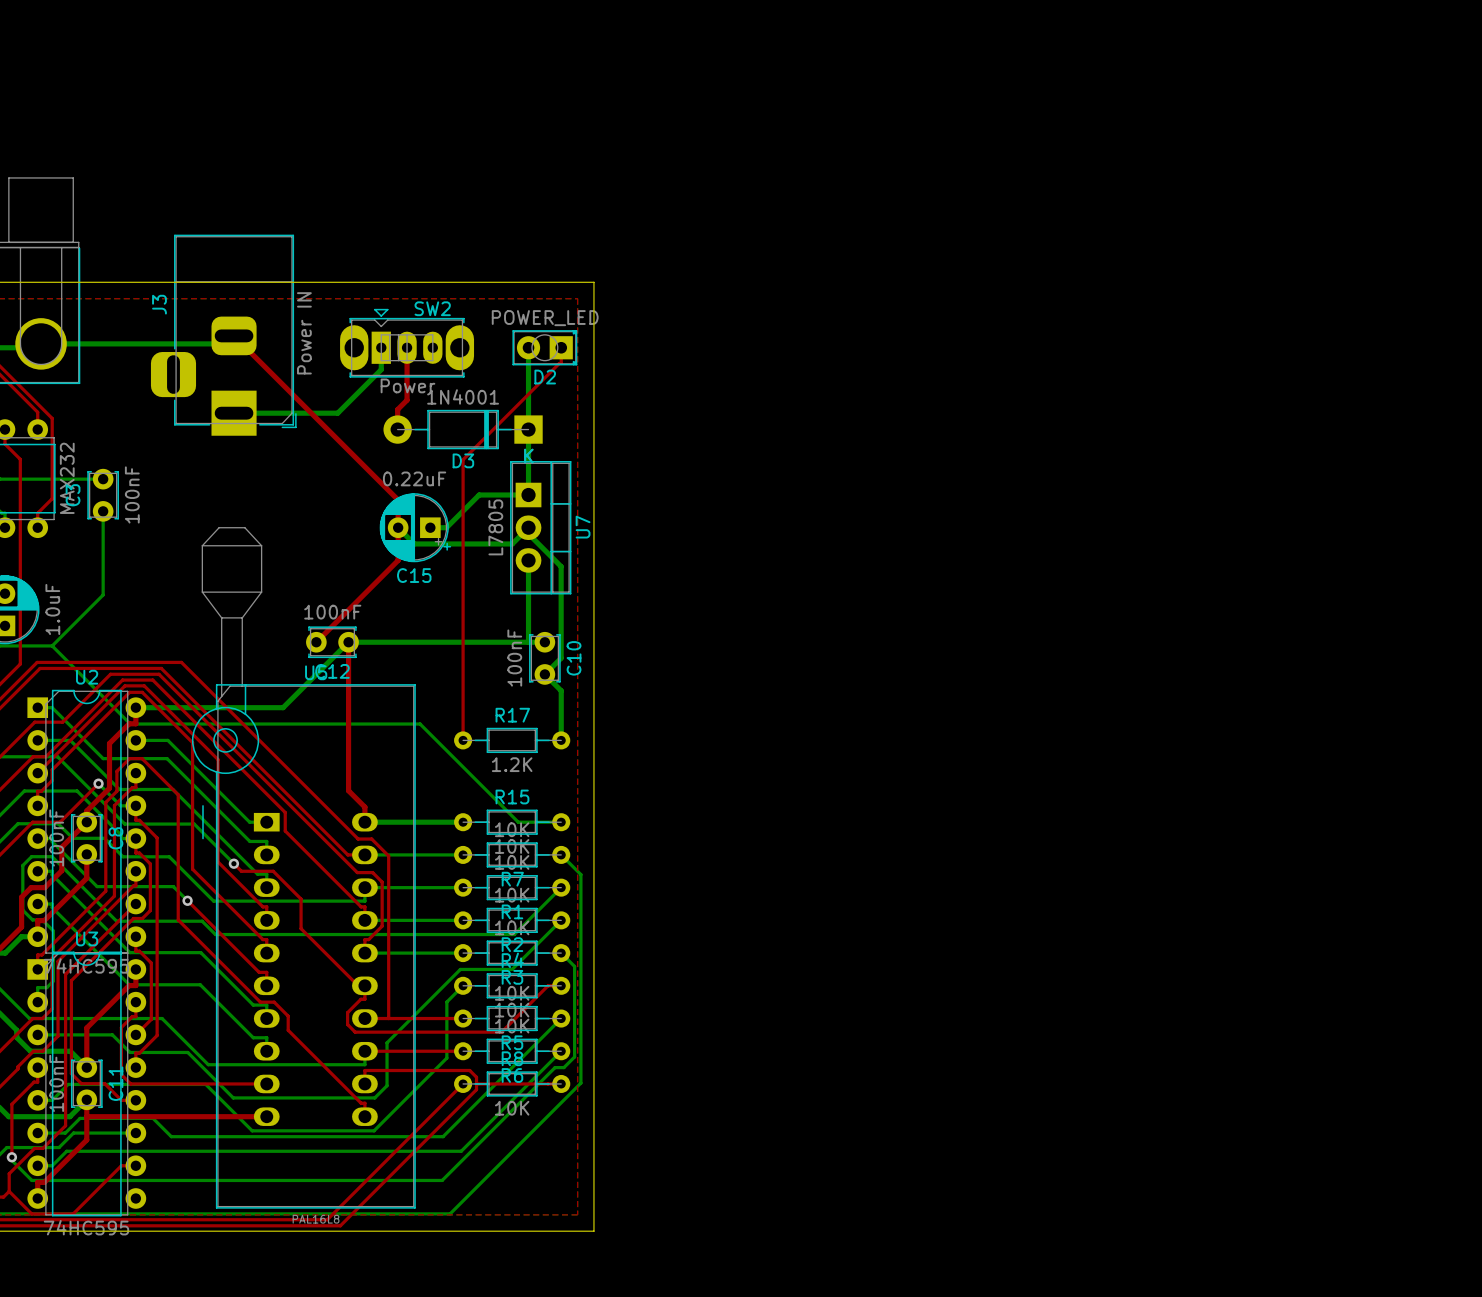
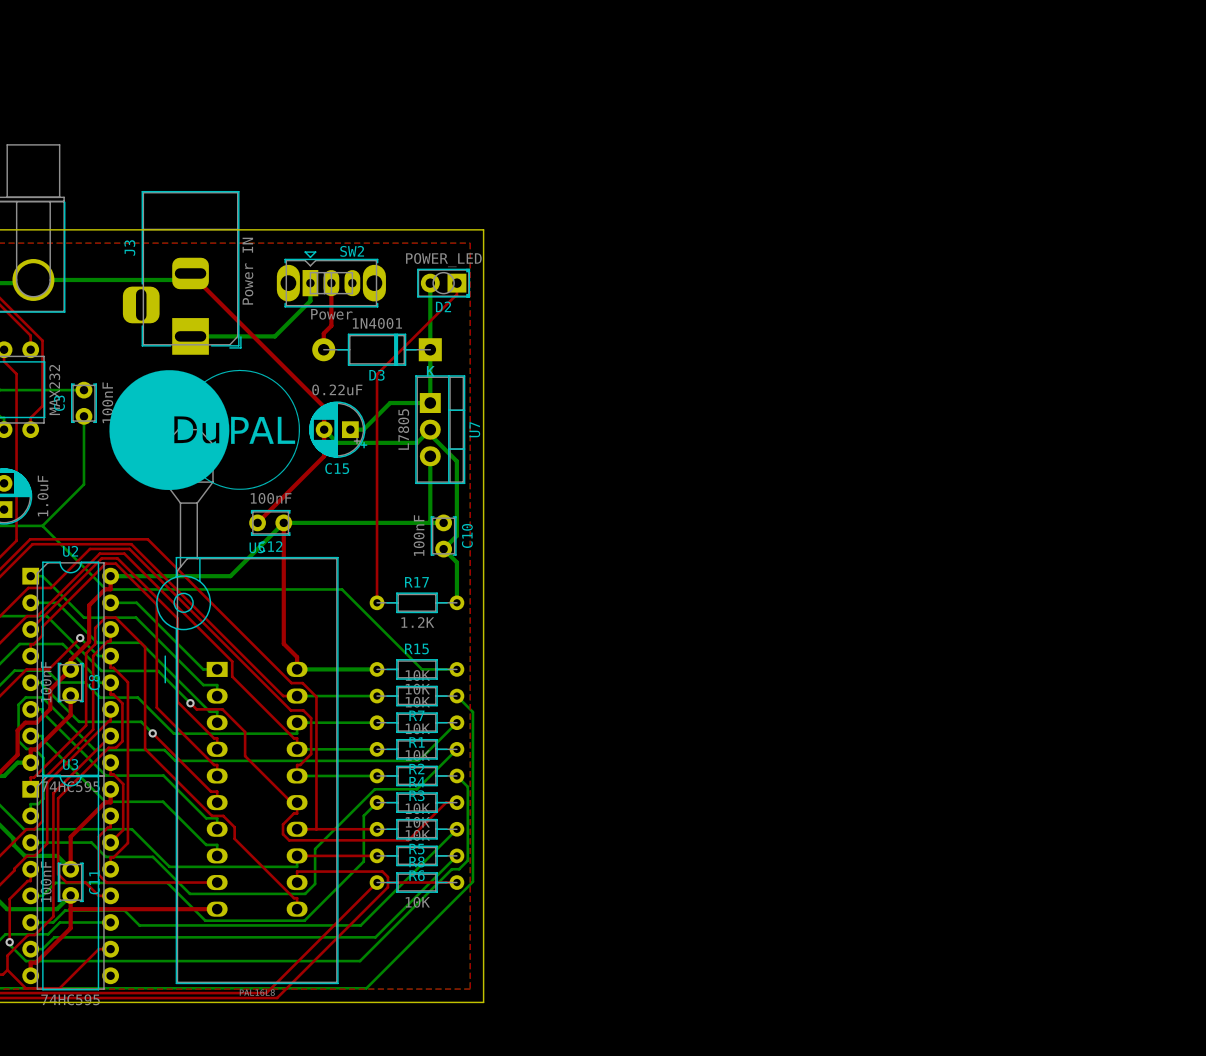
drawing: none -> [109, 369, 300, 491]

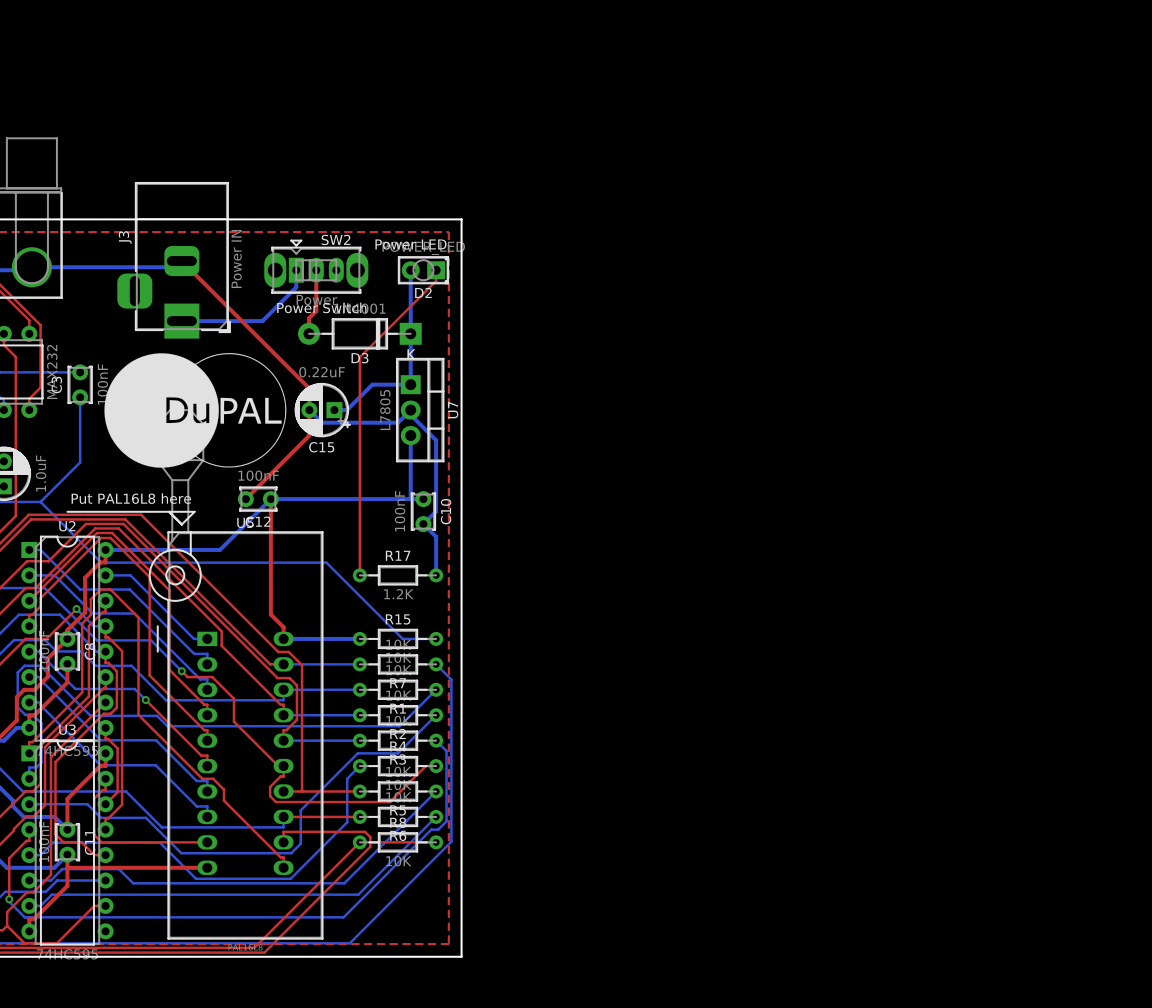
text: none -> Power LED (410, 244)
text: none -> Power Switch (321, 307)
text: none -> Put PAL16L8 here (131, 498)
line: none -> (67, 511) (194, 511) (181, 524) (169, 511)

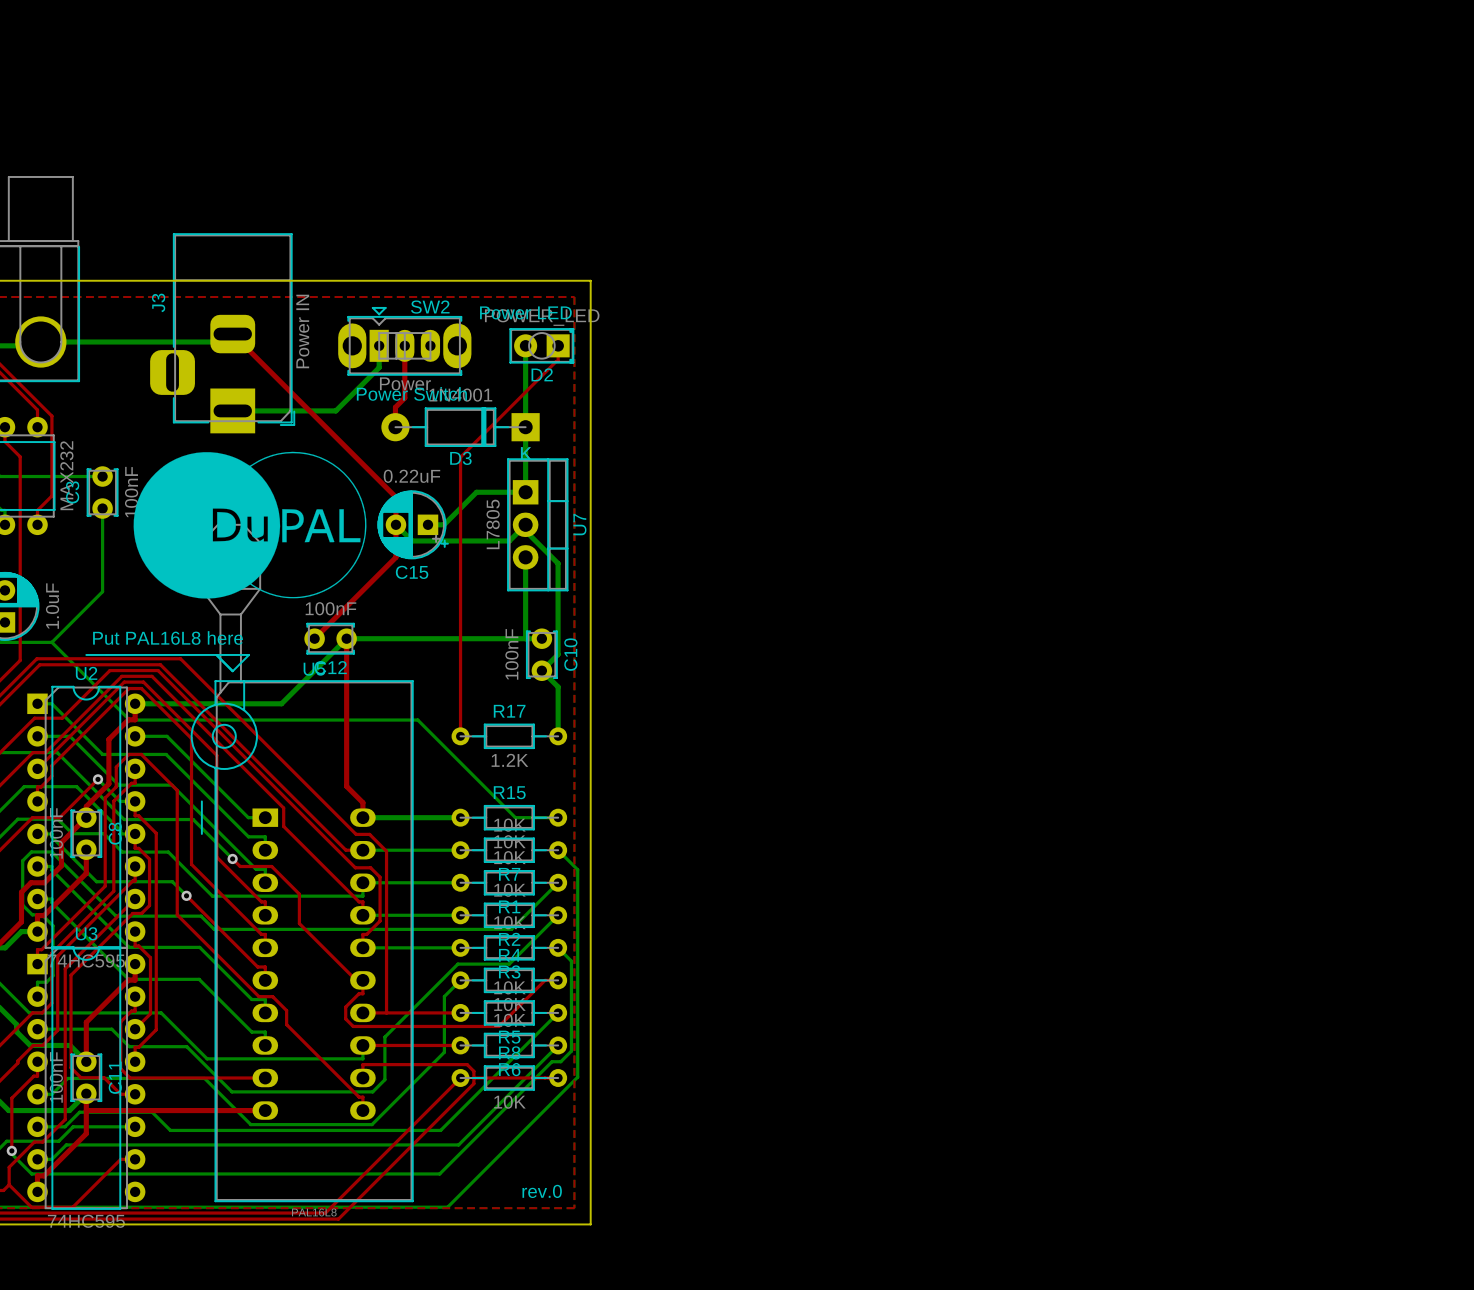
text: none -> rev.0 (542, 1191)

